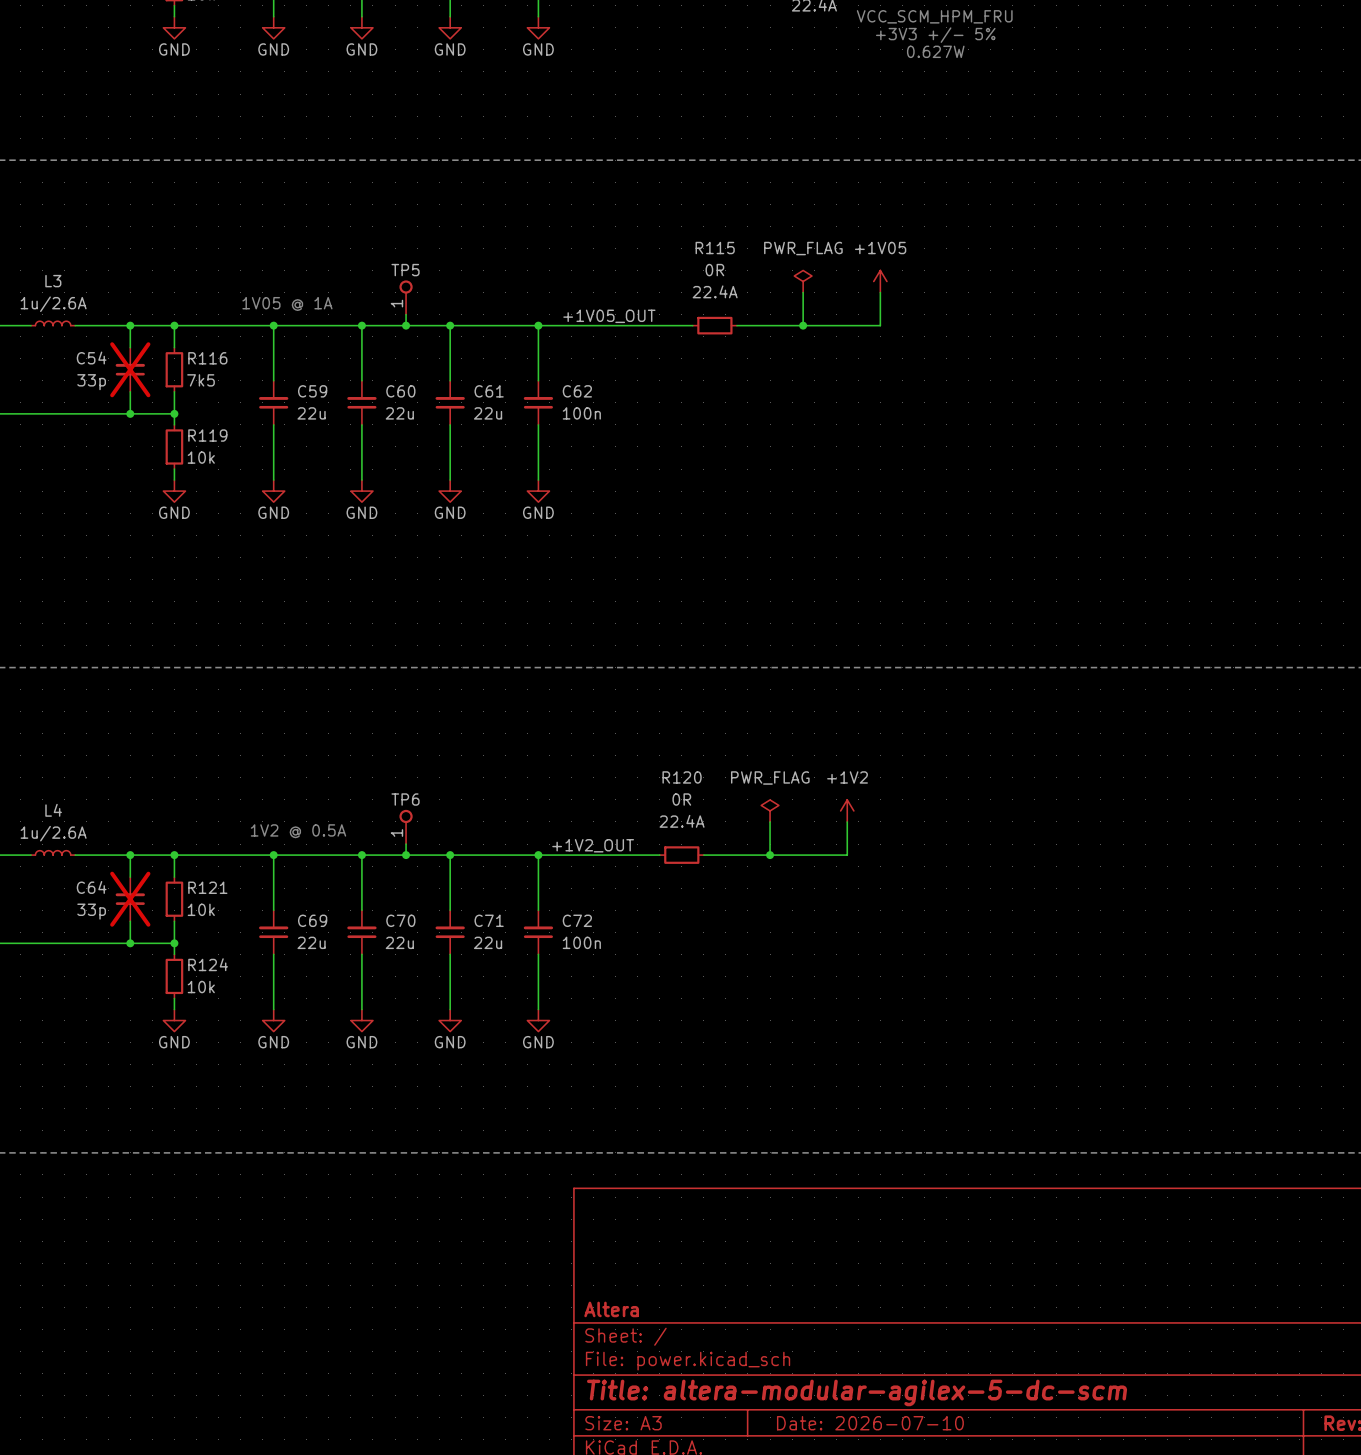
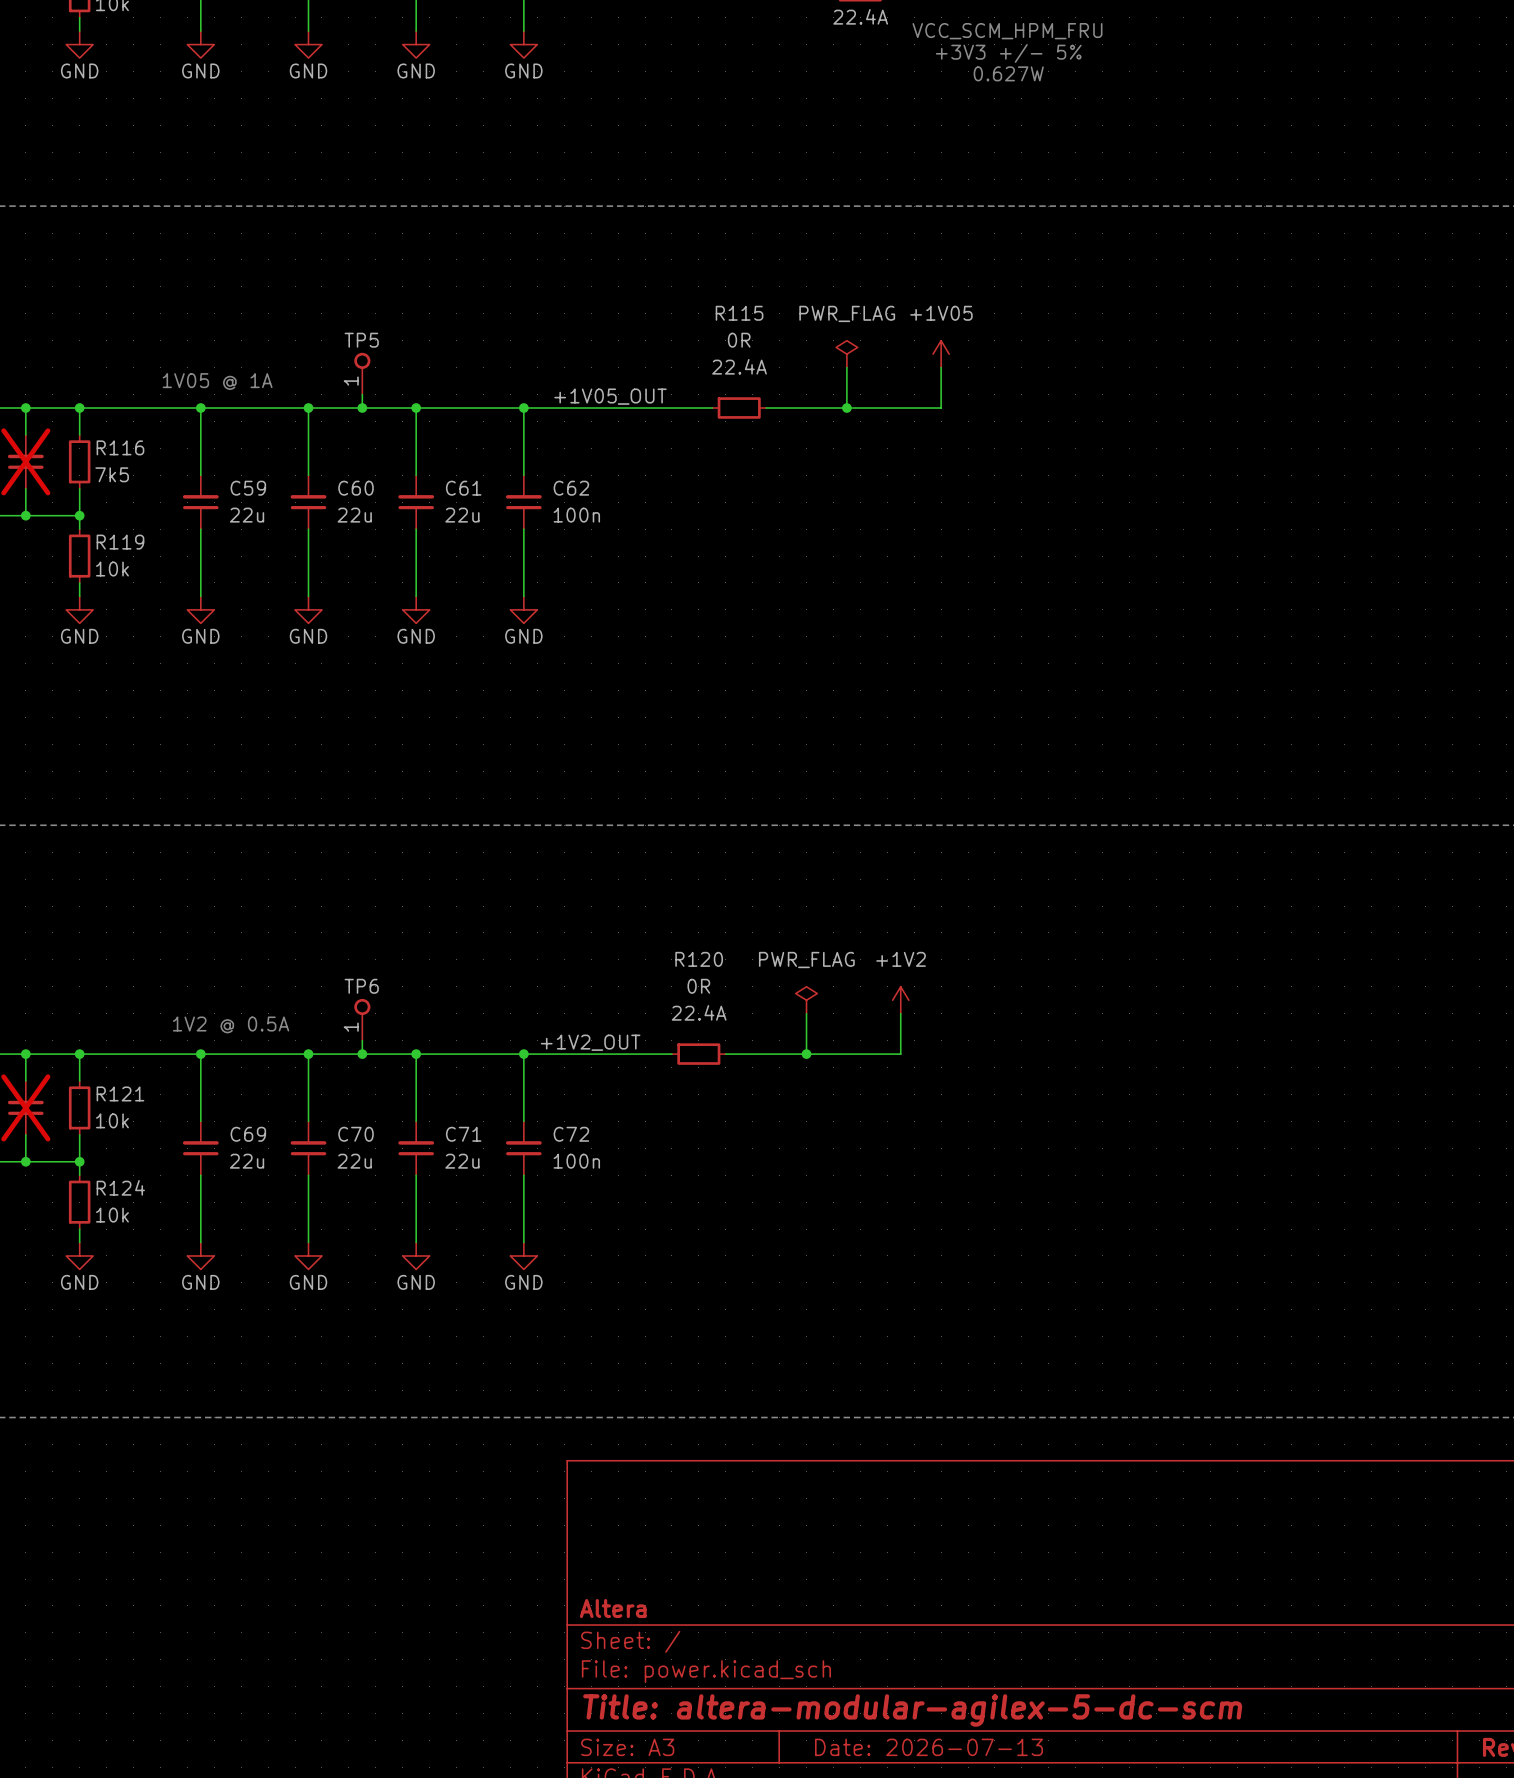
title block: Date: 2026-07-10 (870, 1423) -> Date: 2026-07-13 (928, 1747)

